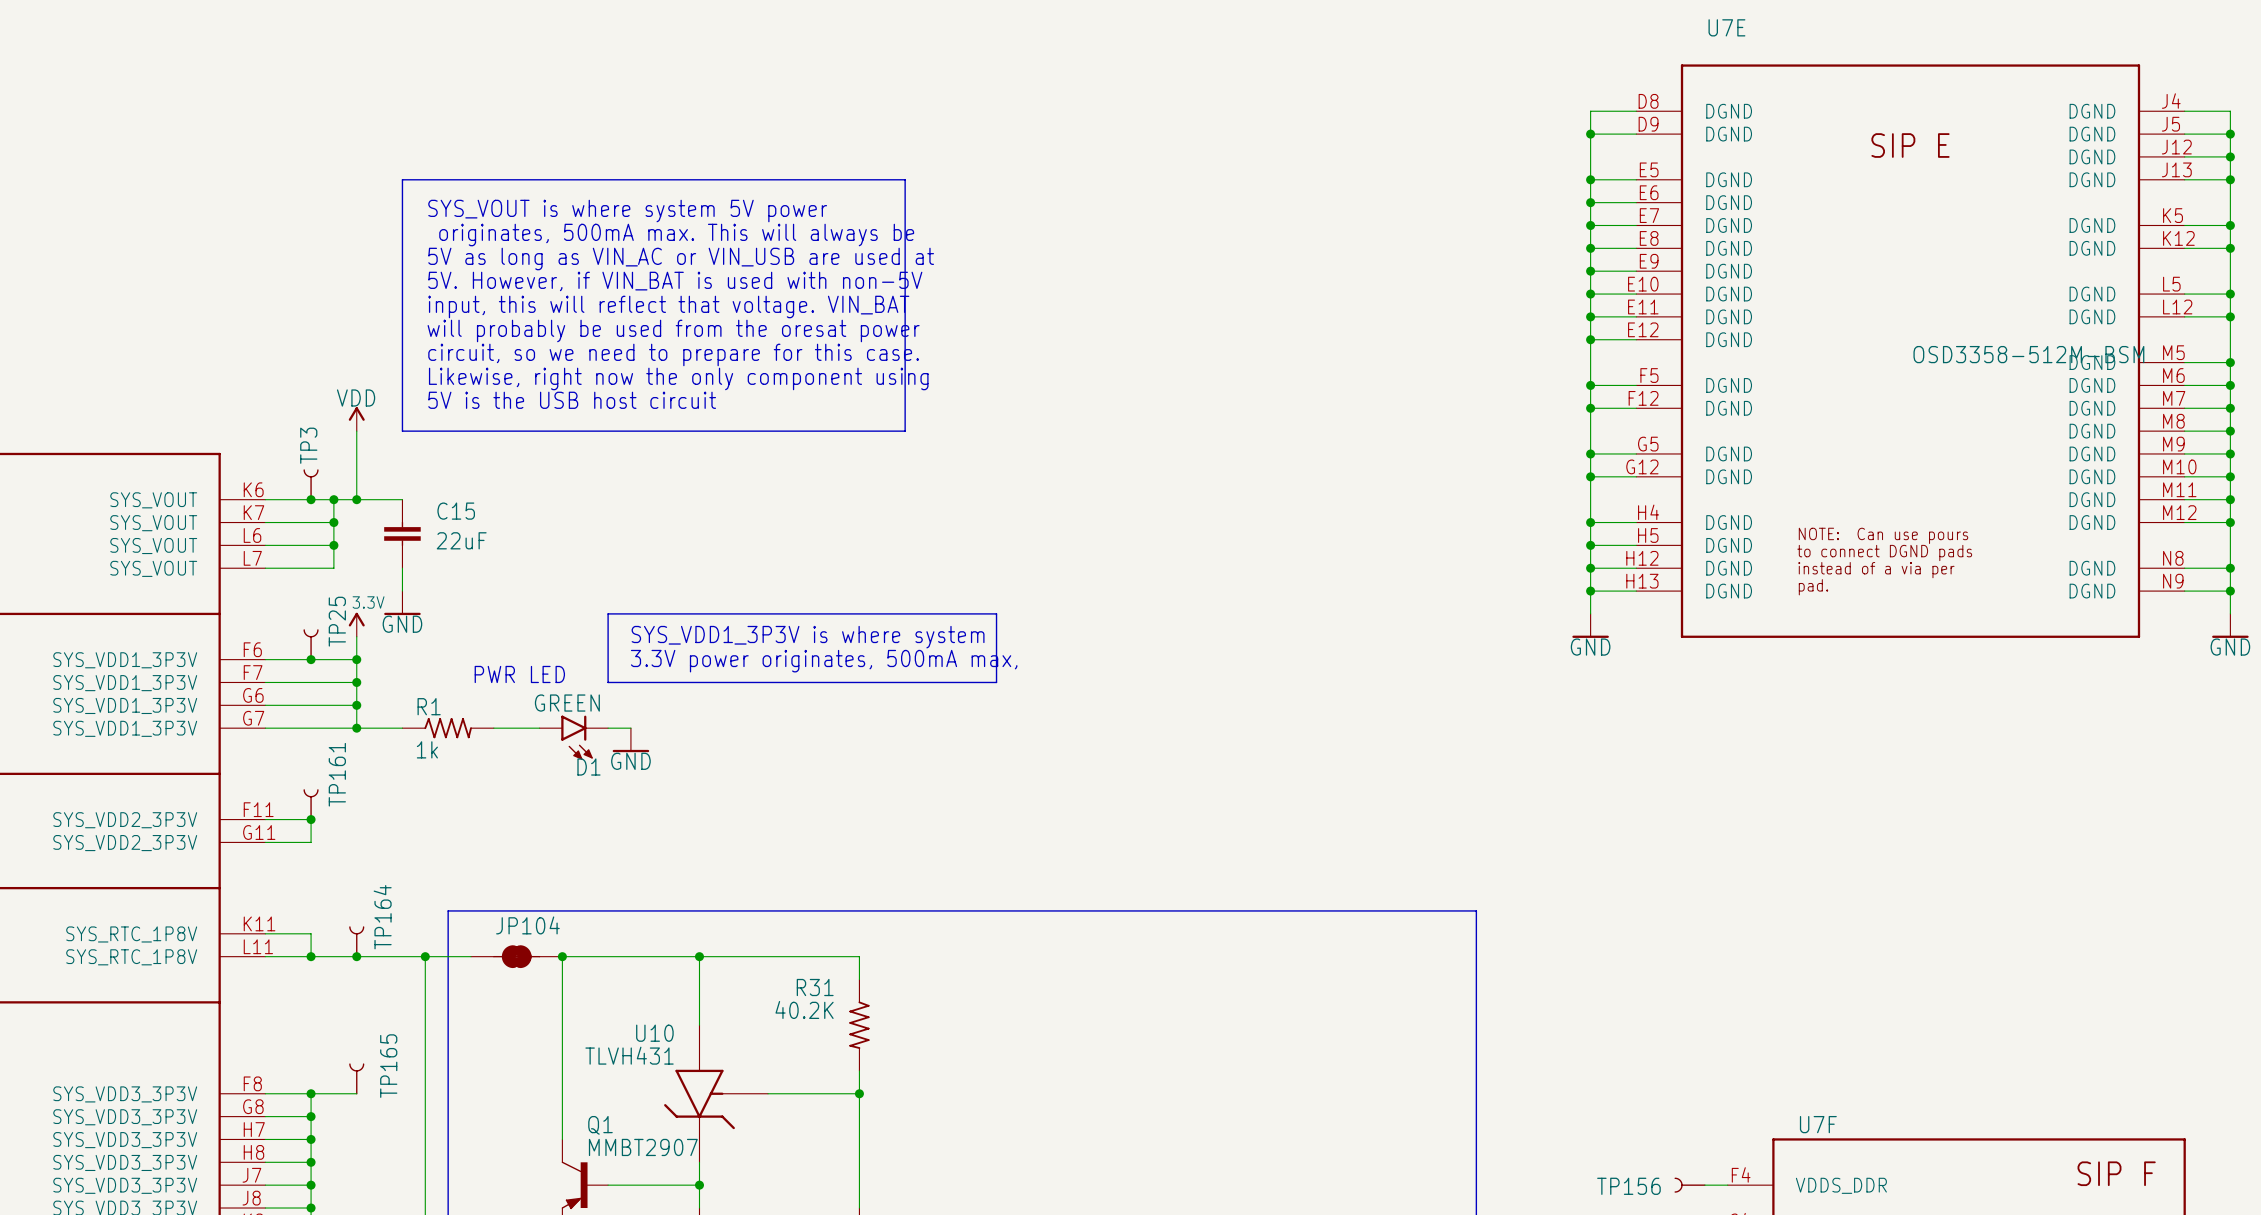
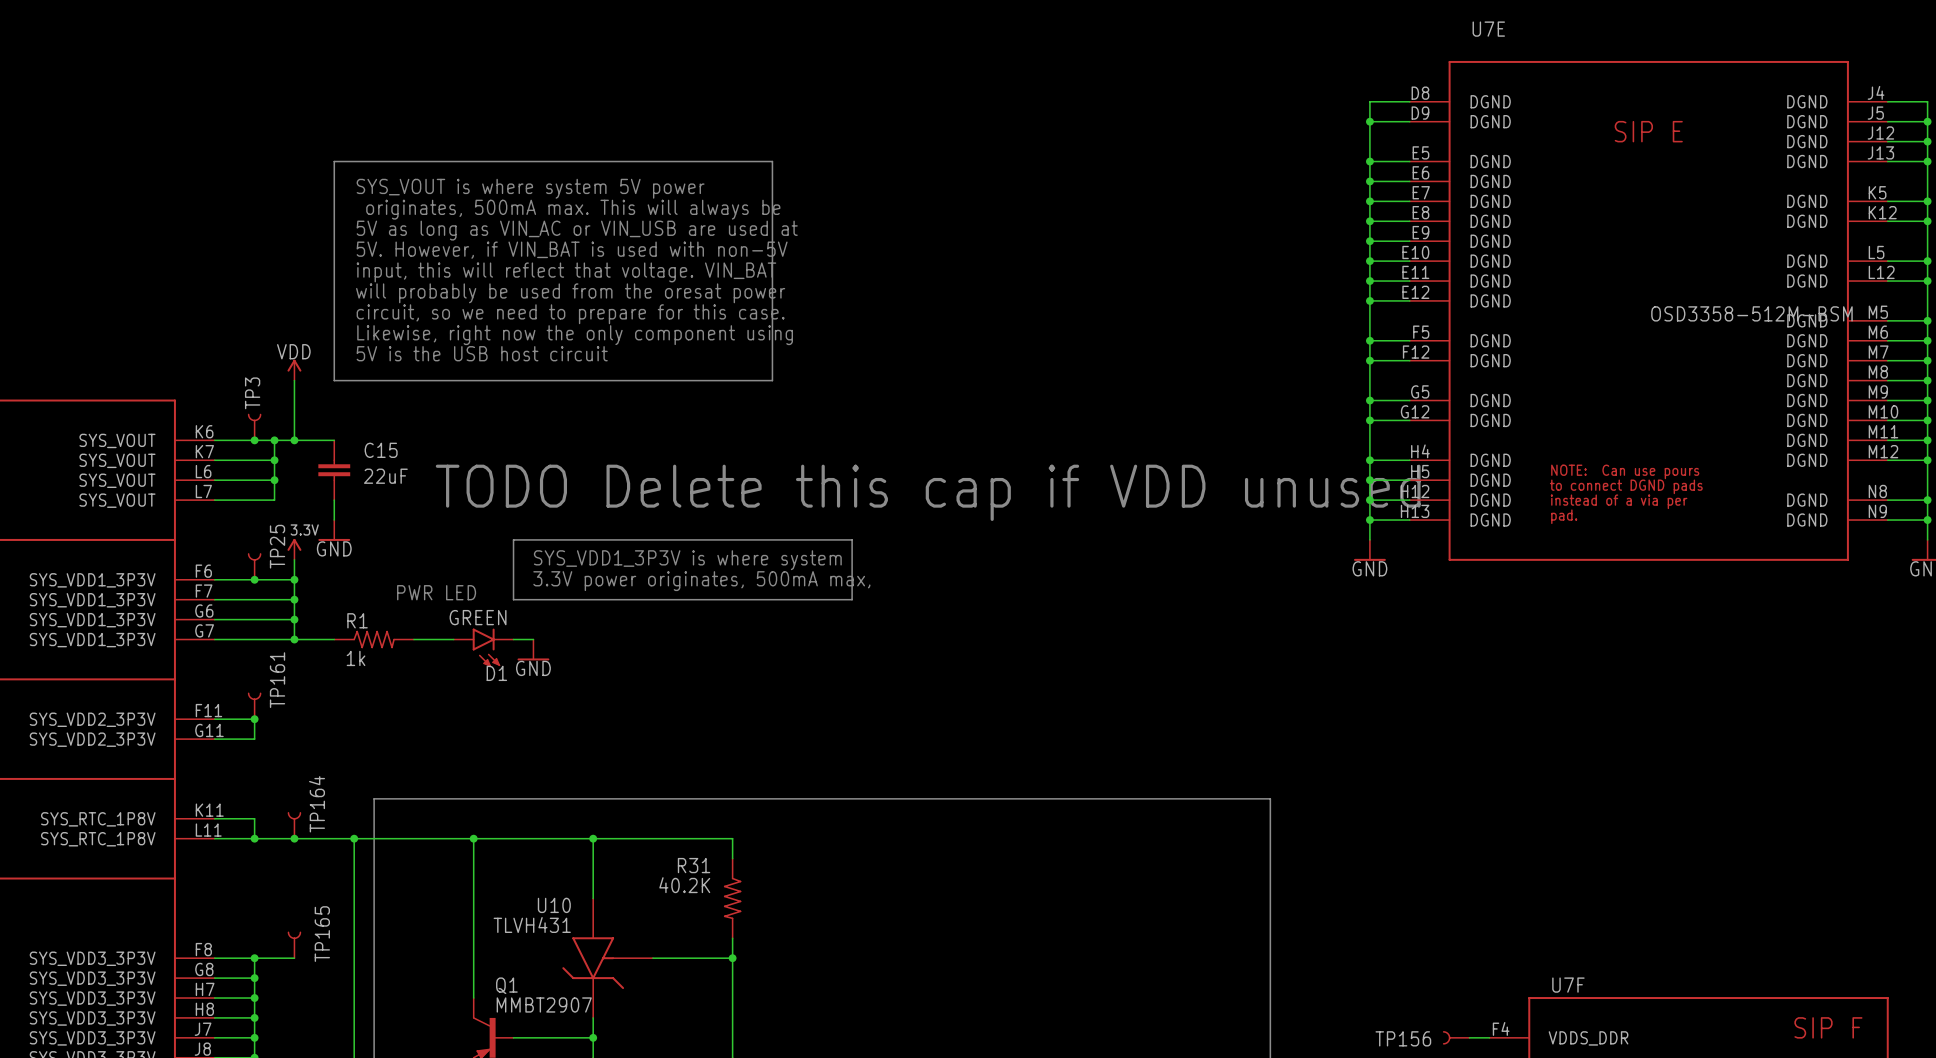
text: none -> TODO Delete this cap if VDD unused (928, 492)
JP104: (516, 956) -> none

